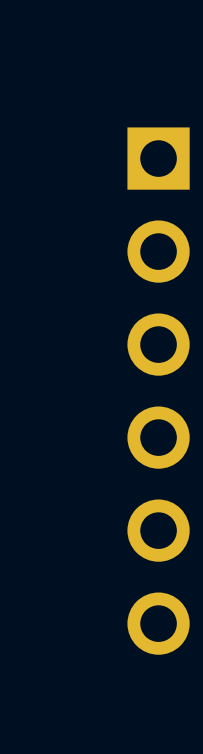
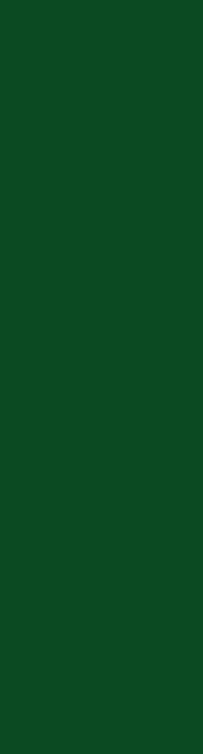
part: (158, 391) -> none

